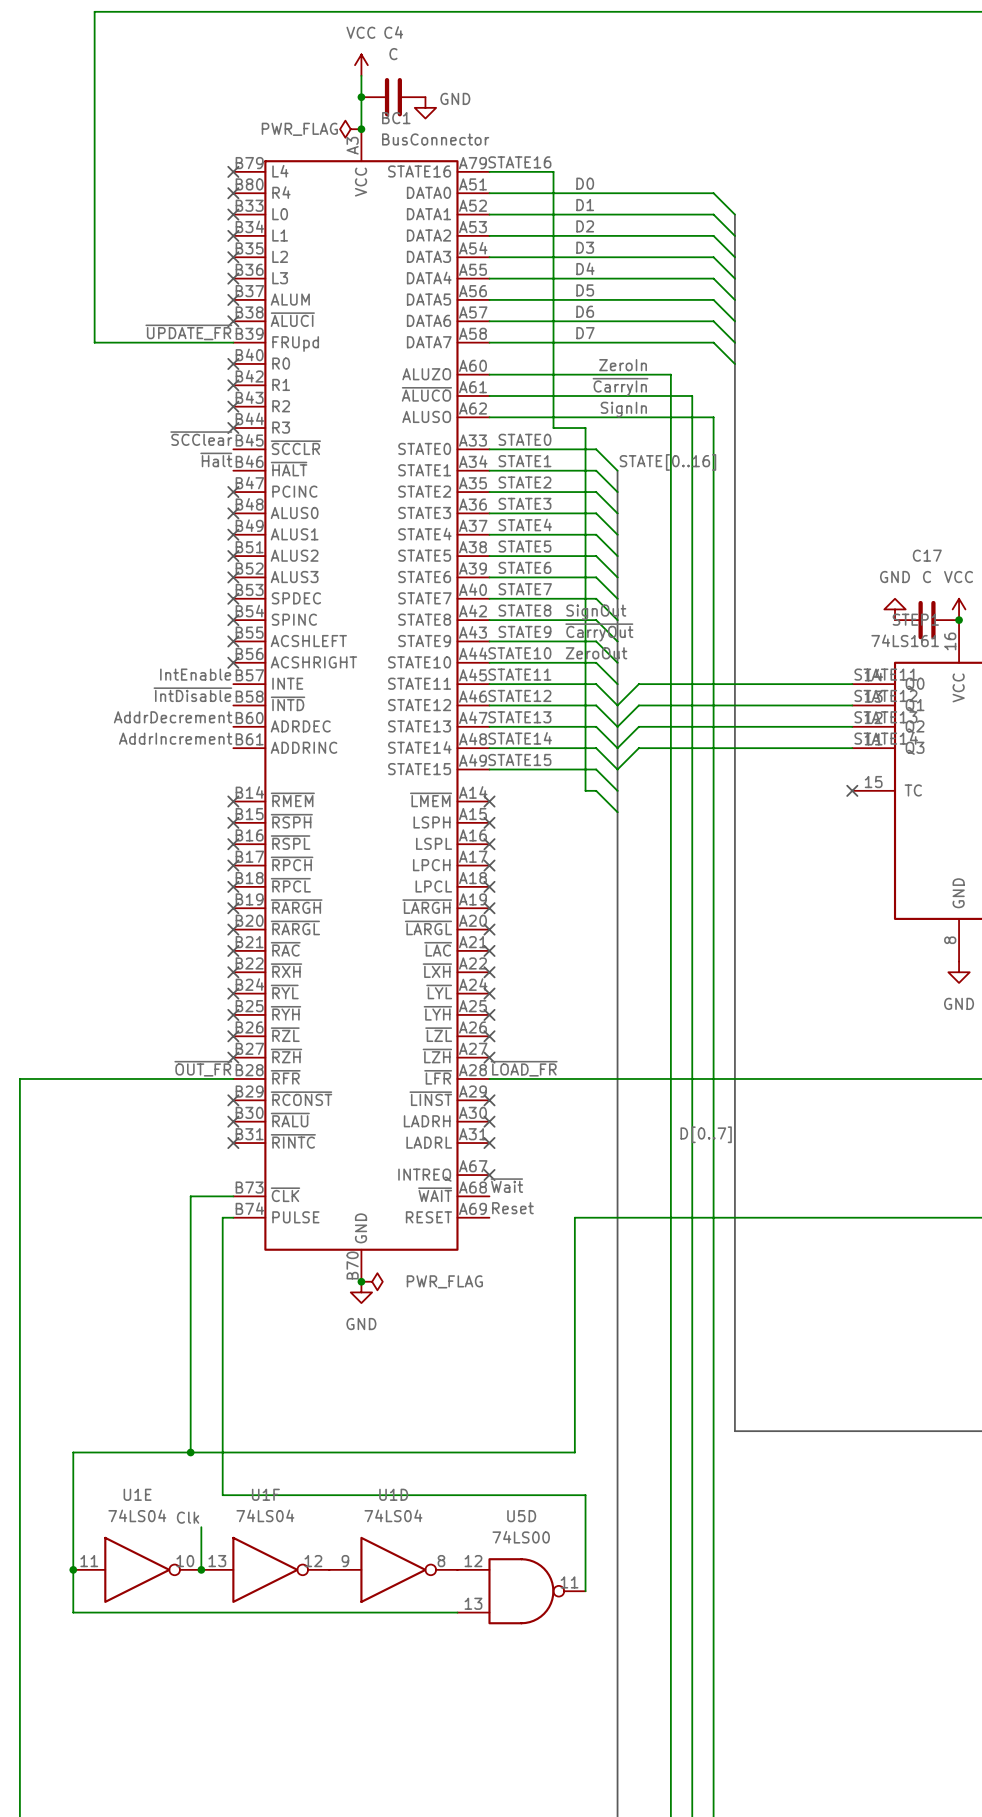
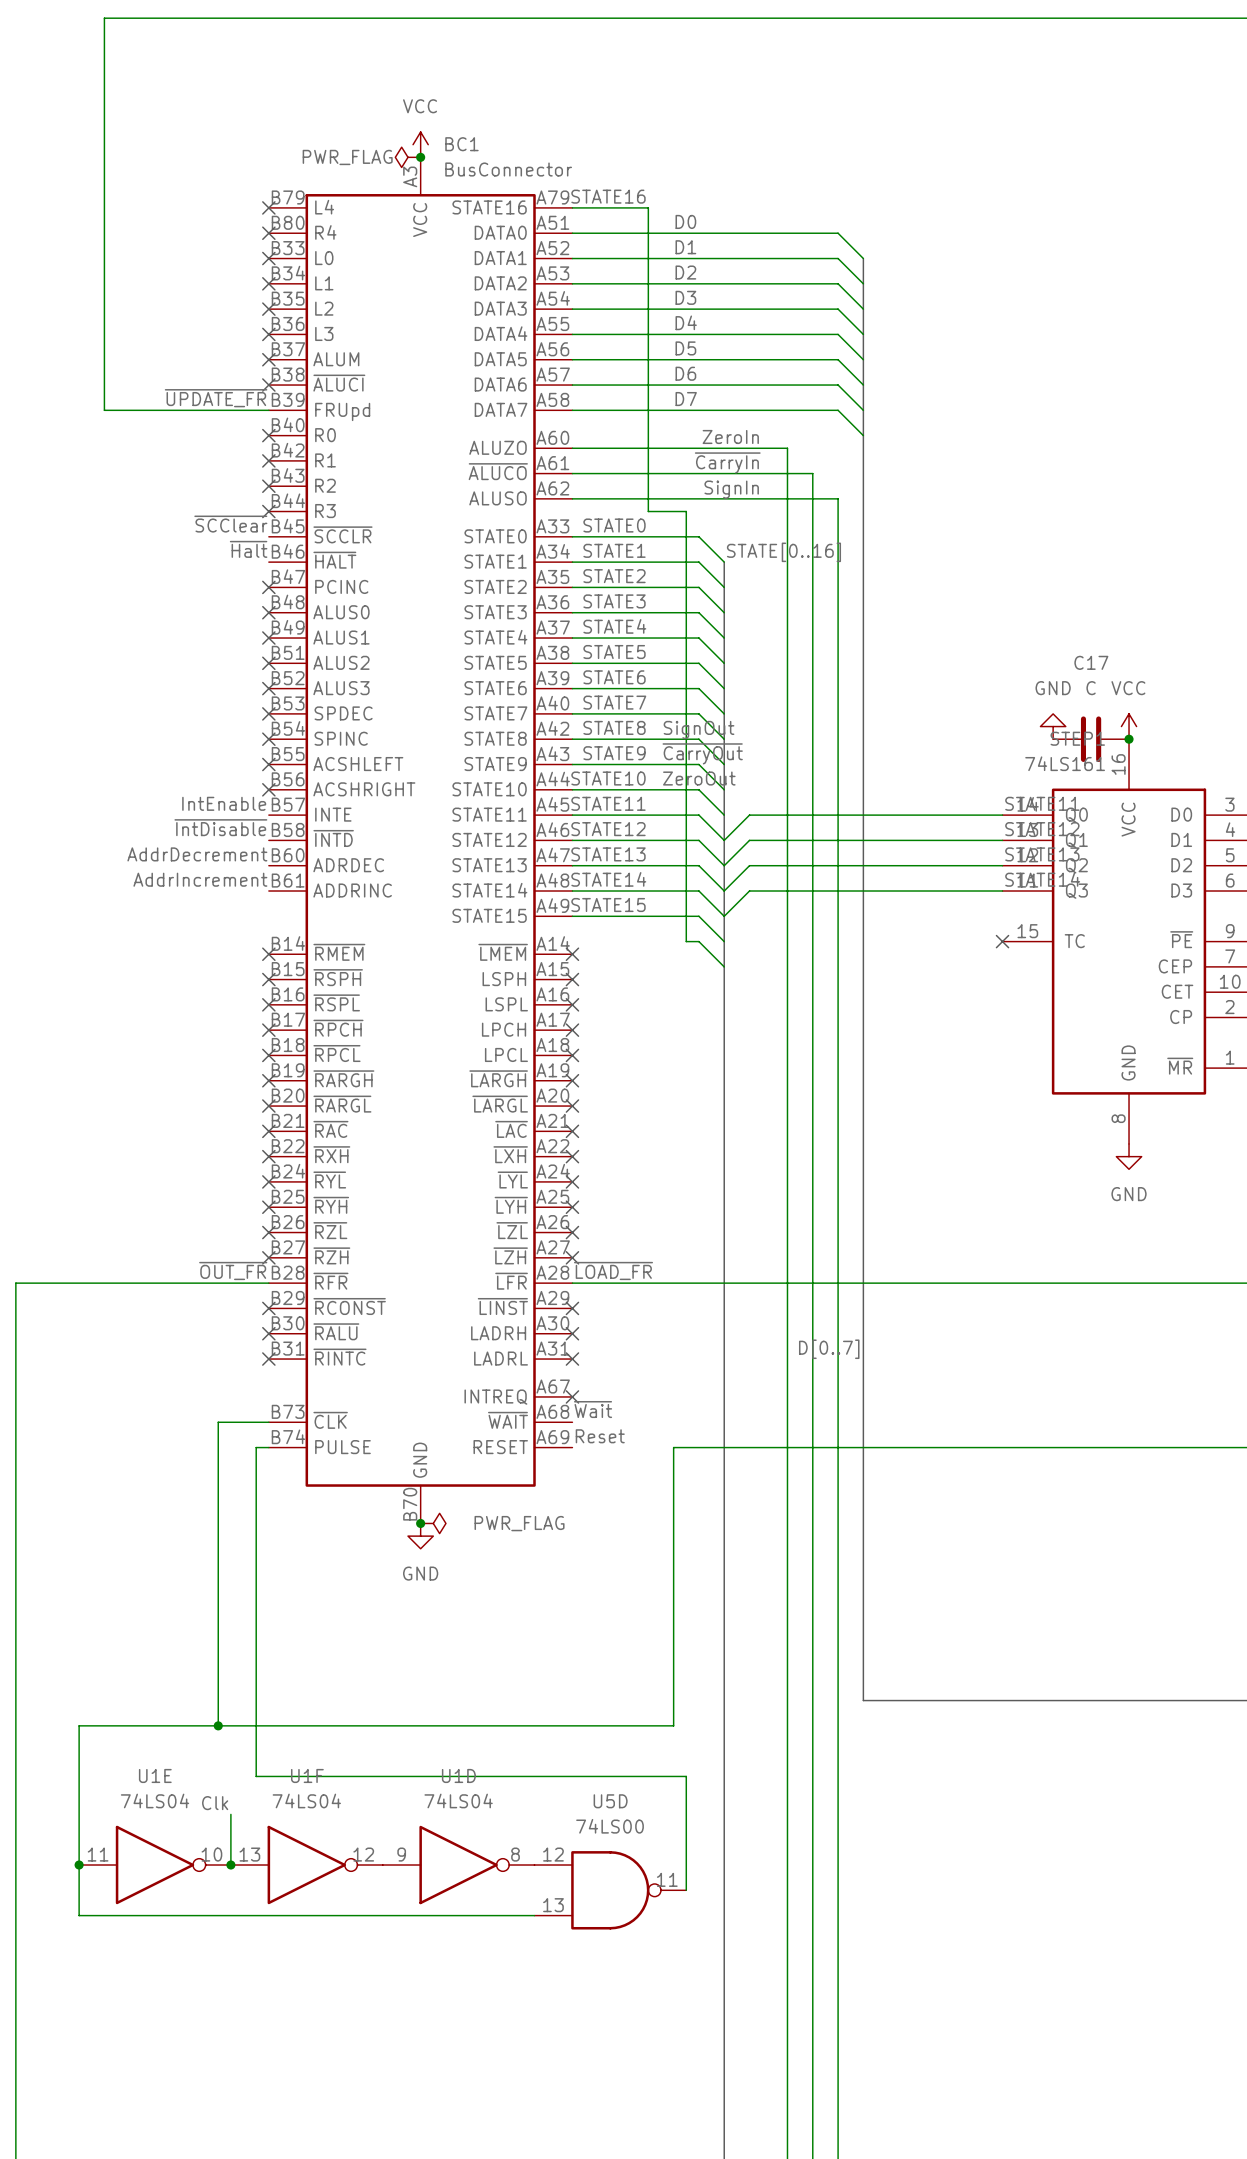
power symbol position: VCC (361, 65) -> VCC (420, 144)
wire: (361, 75) (361, 129) -> none
junction: (361, 97) -> none
C4: C (393, 97) -> none
power symbol: GND (425, 107) -> none

